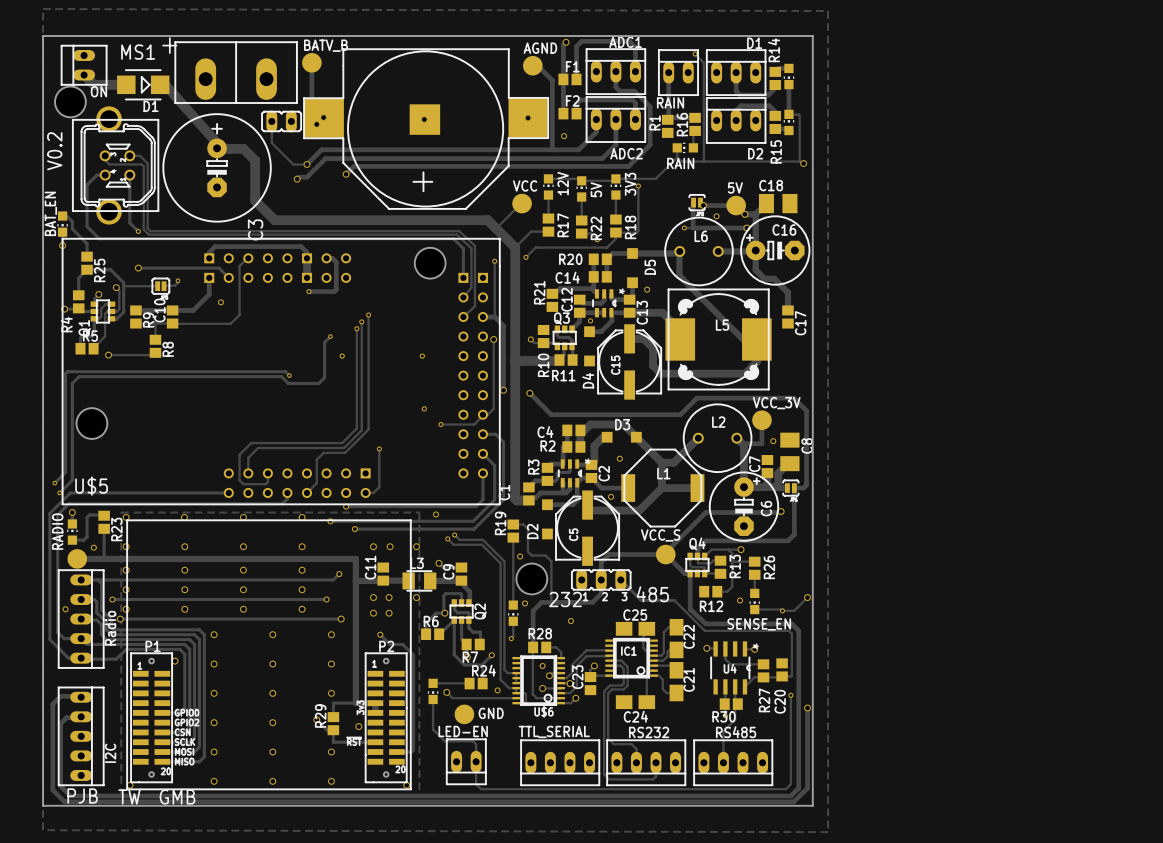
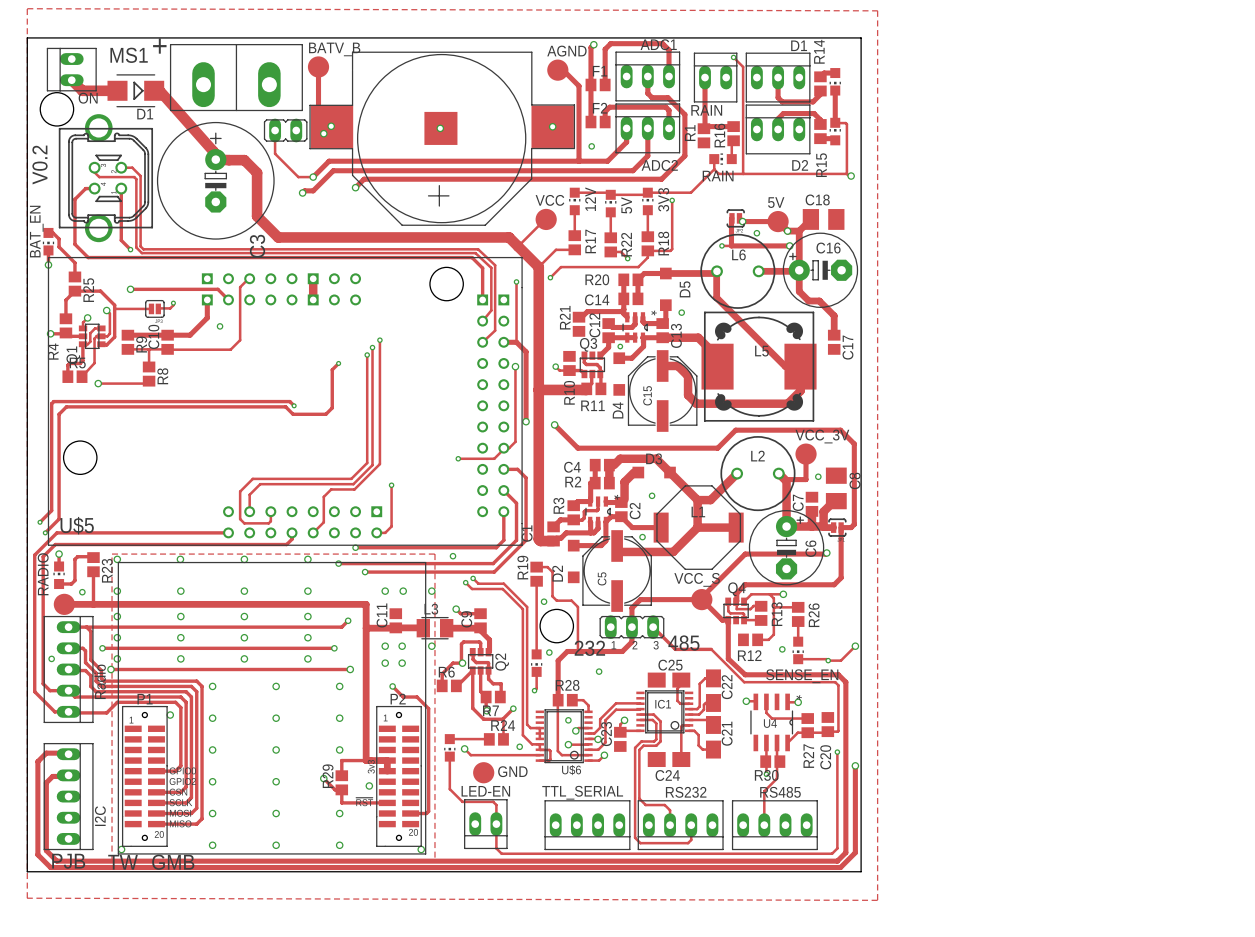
track: (209, 258) (209, 252) (215, 246) (301, 246) (307, 252) (307, 258) -> none
track: (326, 258) (332, 258) (336, 262) (336, 289) (334, 291) (308, 291) -> none
via: (308, 291) -> none
via: (342, 356) -> none
via: (422, 356) -> none
via: (424, 408) -> none

